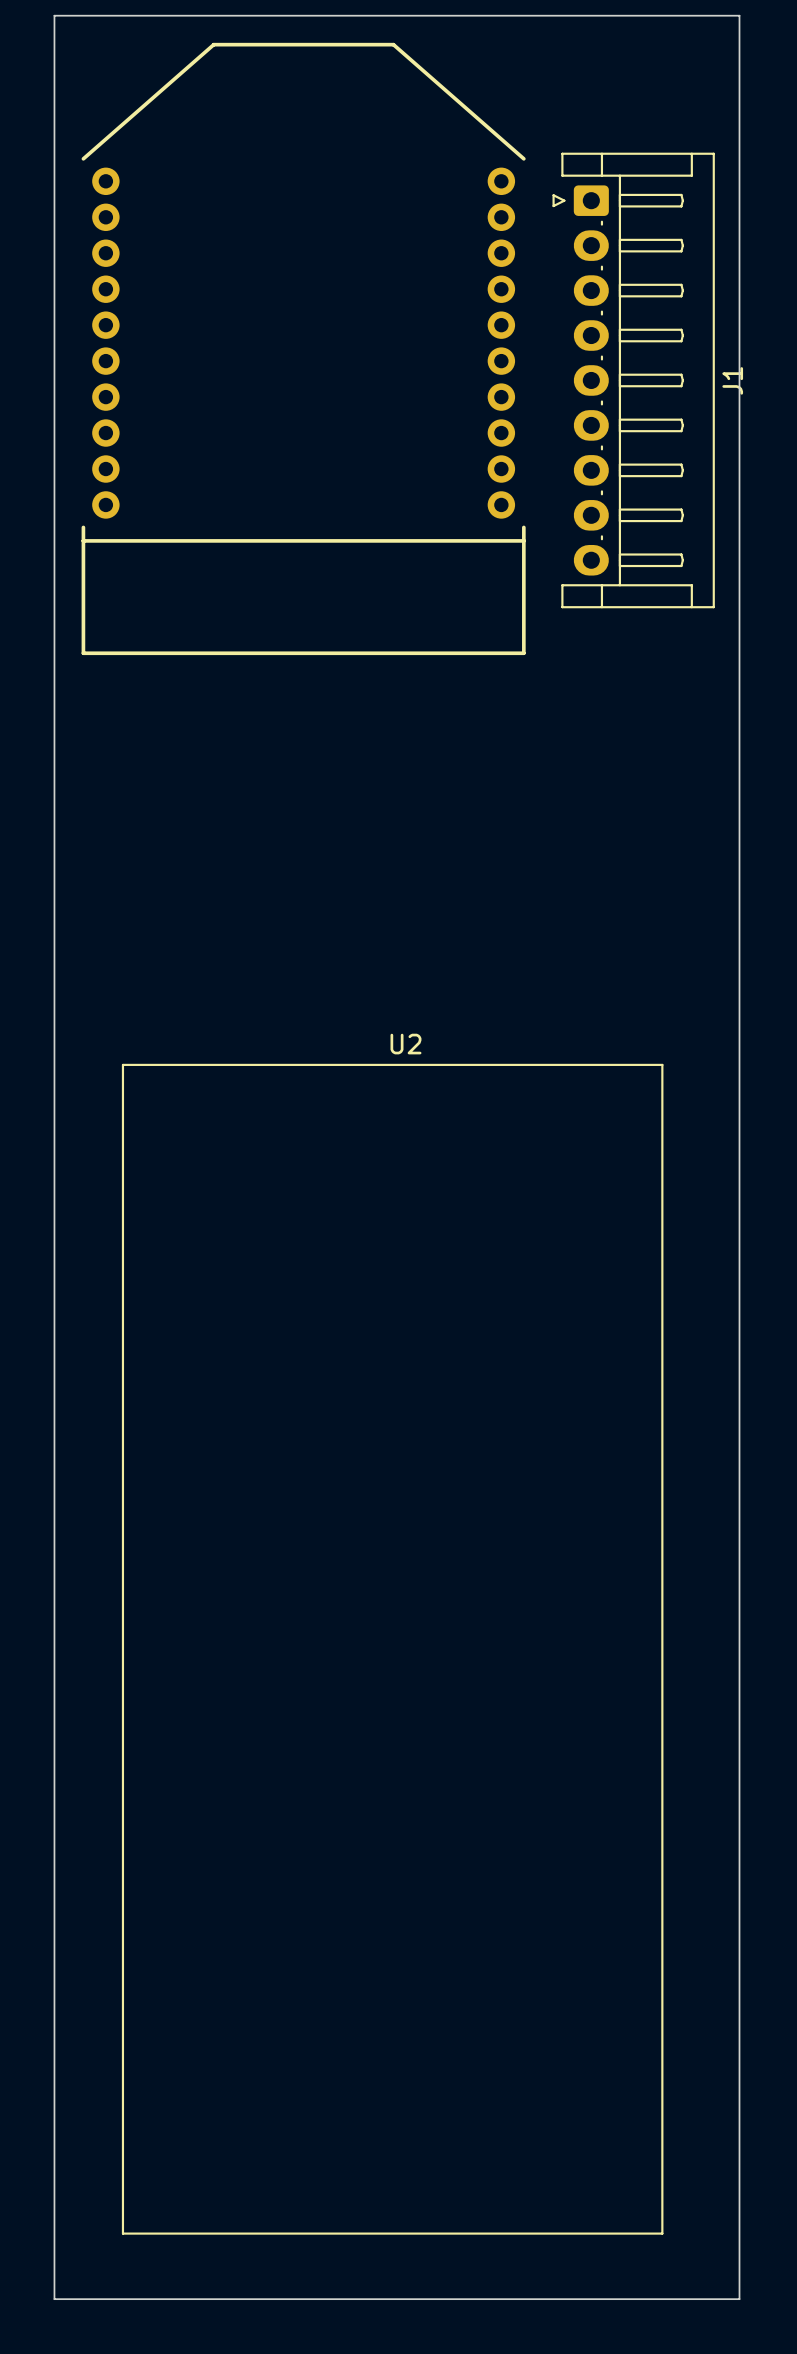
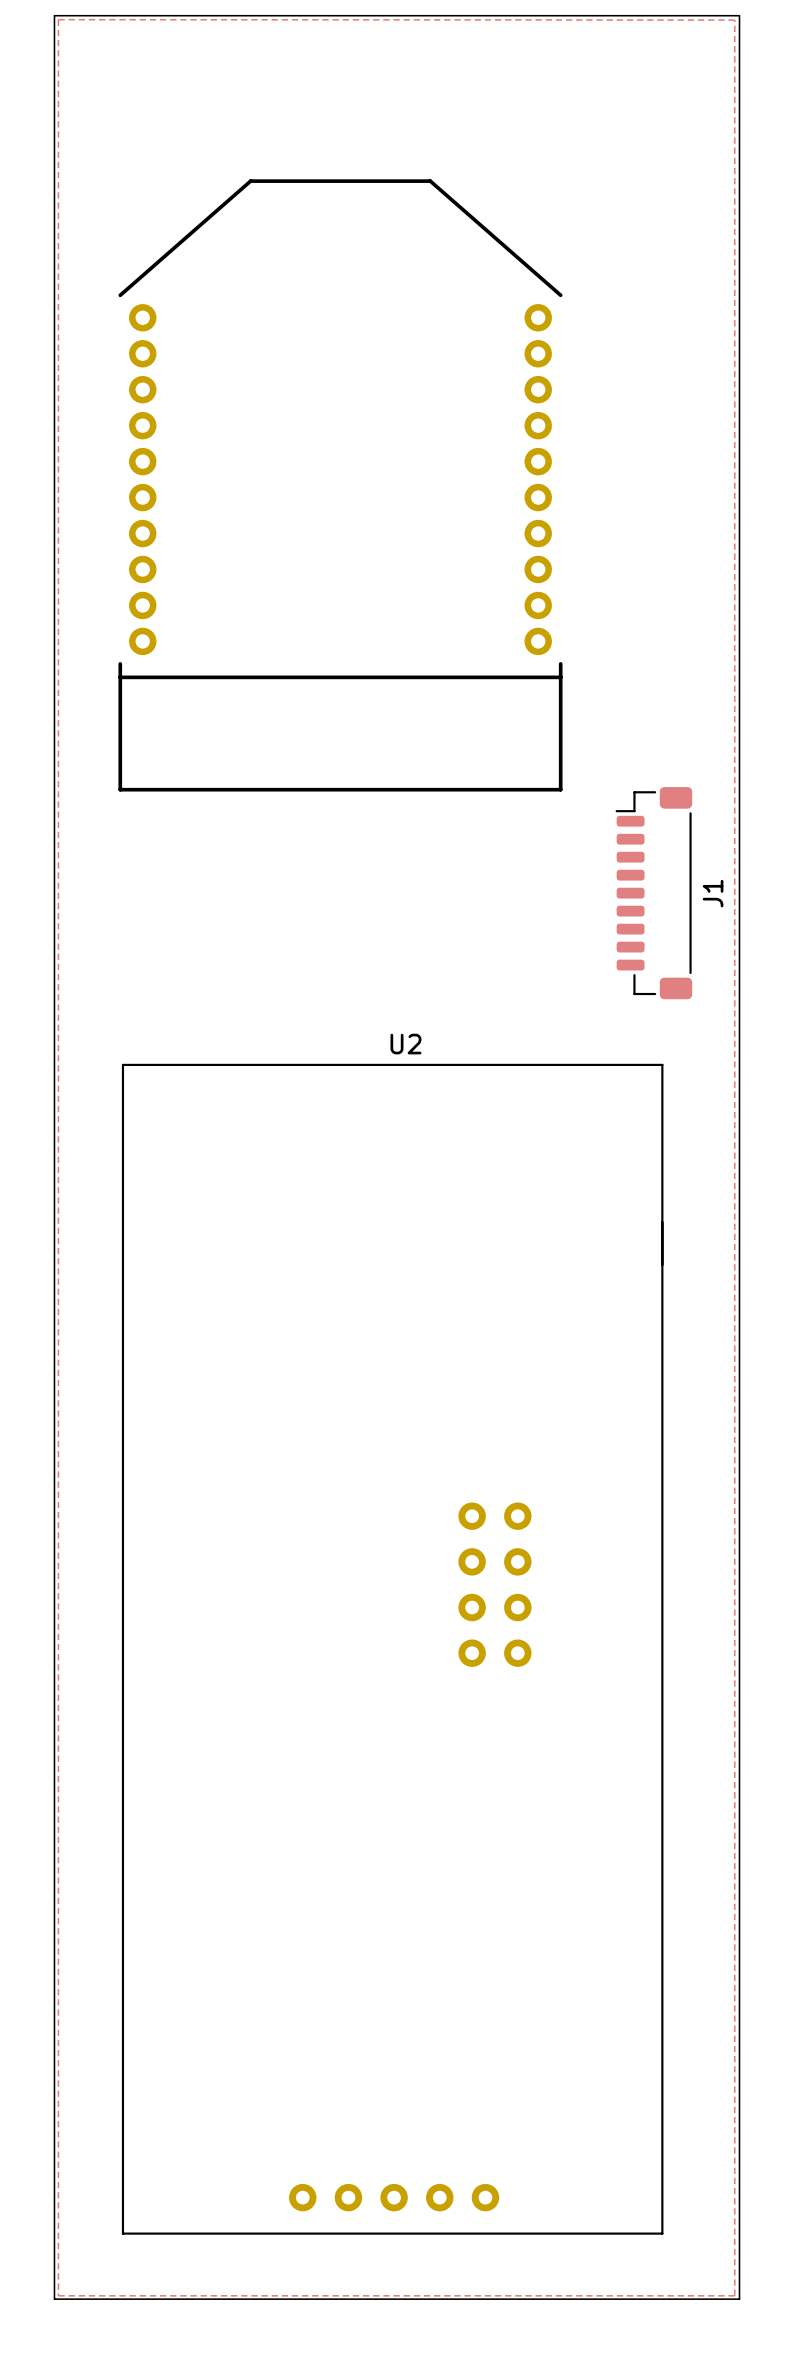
zone outline: none -> (58, 19) (58, 2295) (734, 2295) (734, 20) (58, 19)
J1 footprint: [552, 152, 715, 609] -> [615, 787, 693, 1000]
part position: (303, 348) -> (340, 485)
J1 name position: J1 (732, 380) -> J1 (713, 893)
U2 footprint: [121, 1063, 664, 2235] -> [121, 1063, 664, 2235]

